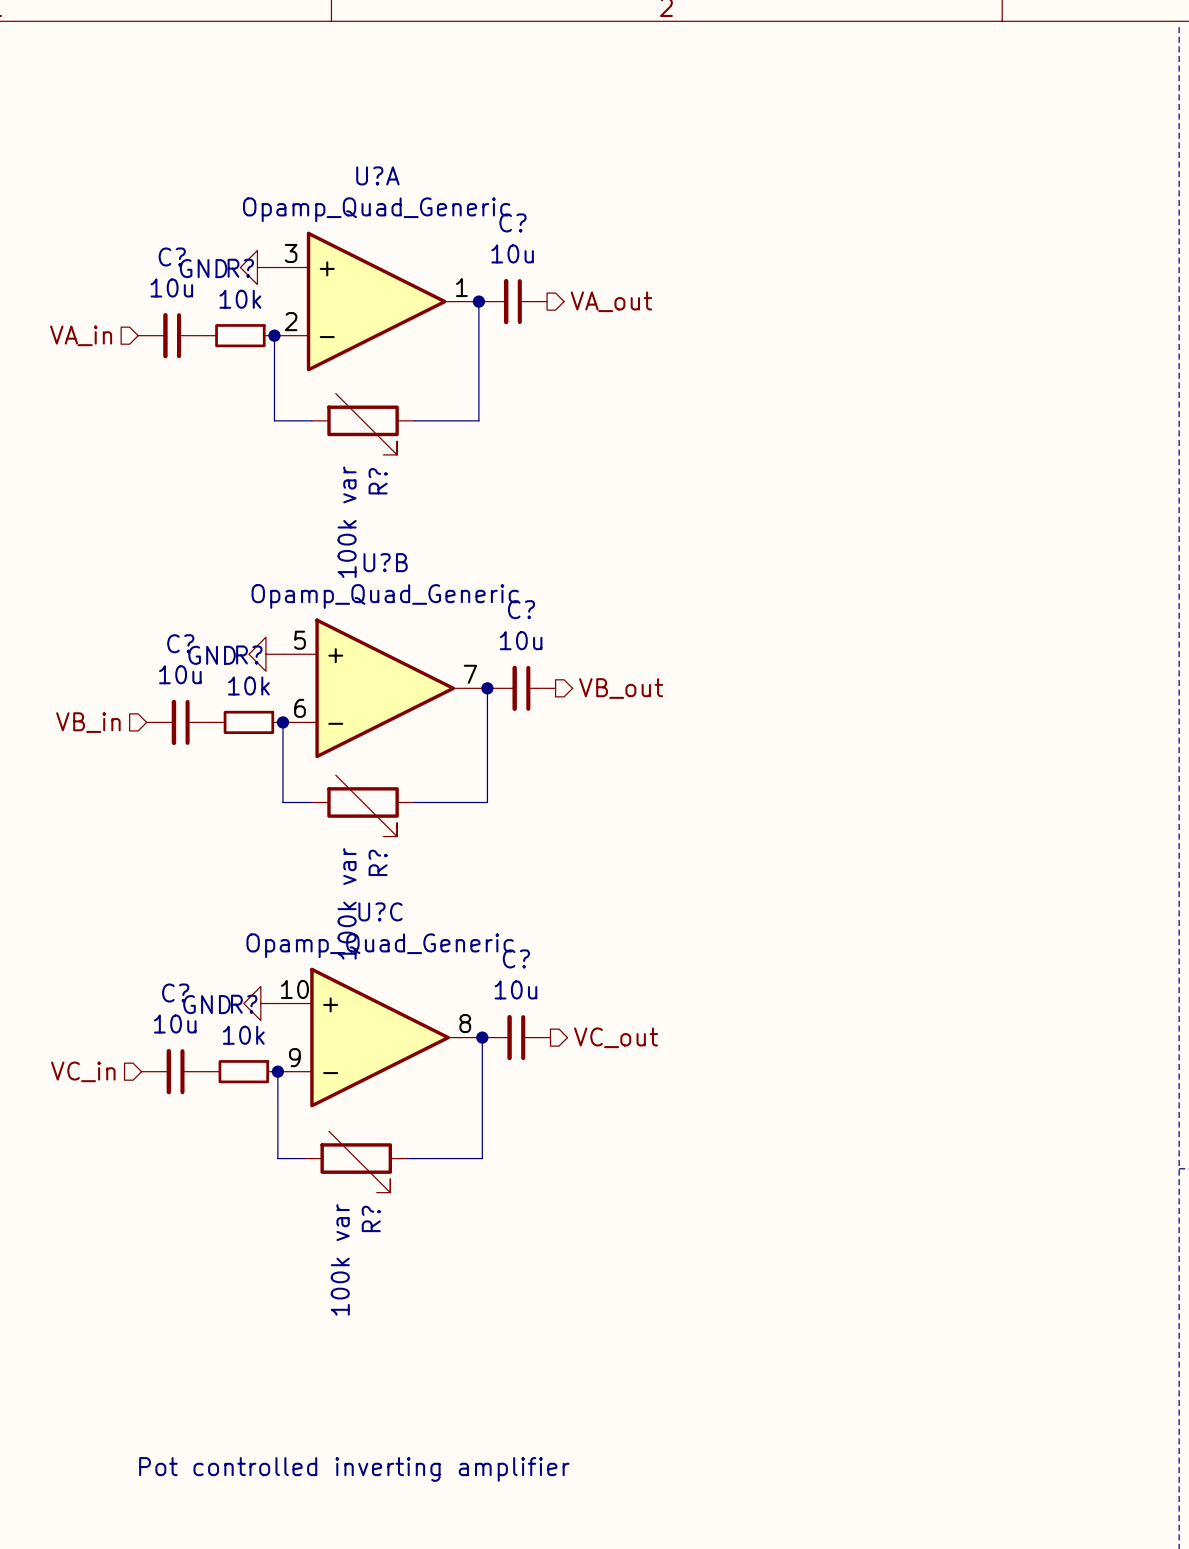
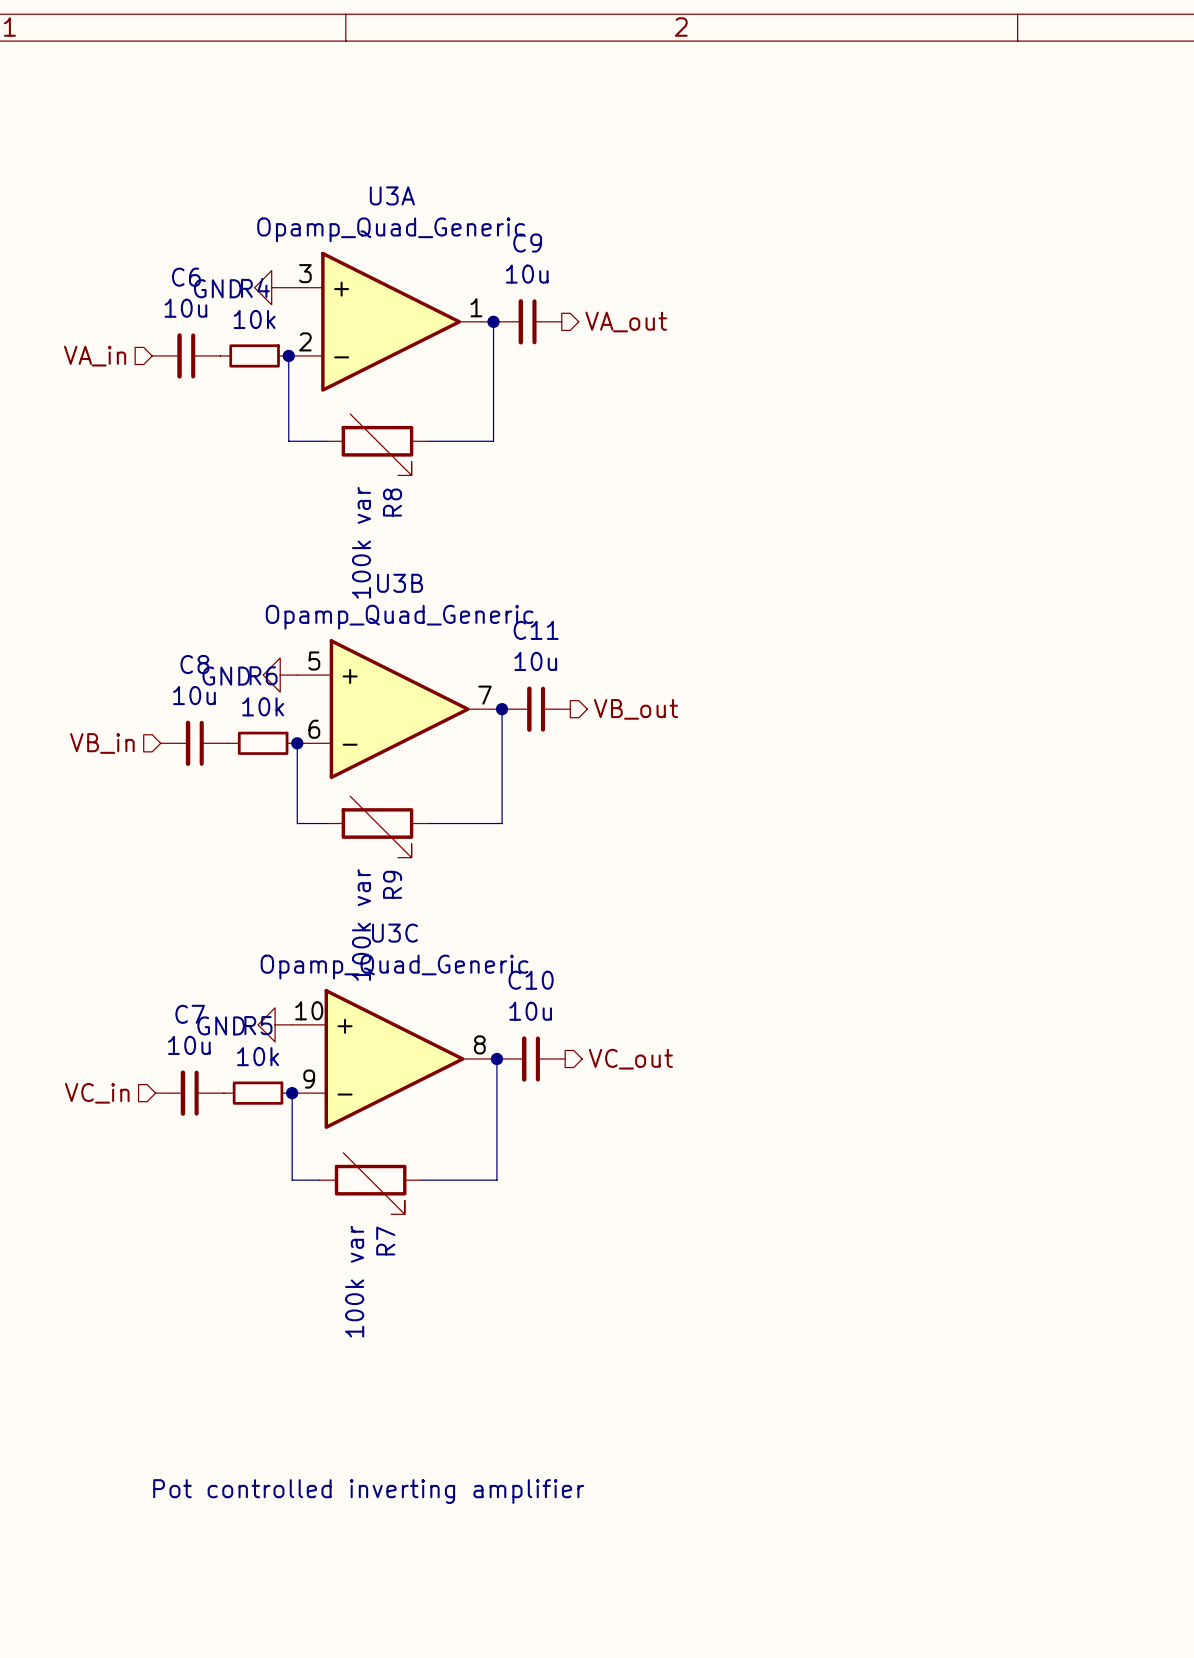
U?A name: U?A (377, 175) -> U3A (392, 195)
C? name: C? (512, 222) -> C9 (527, 243)
C? name: C? (172, 257) -> C6 (186, 277)
R? name: R? (240, 268) -> R4 (255, 288)
R? name: R? (378, 481) -> R8 (392, 502)
U?B name: U?B (385, 562) -> U3B (400, 583)
C? name: C? (521, 609) -> C11 (536, 630)
C? name: C? (180, 643) -> C8 (194, 664)
R? name: R? (249, 654) -> R6 (263, 675)
R? name: R? (378, 862) -> R9 (392, 884)
U?C name: U?C (380, 911) -> U3C (394, 933)
C? name: C? (516, 958) -> C10 (531, 980)
C? name: C? (175, 993) -> C7 (190, 1014)
R? name: R? (244, 1004) -> R5 (258, 1025)
R? name: R? (371, 1218) -> R7 (385, 1241)

